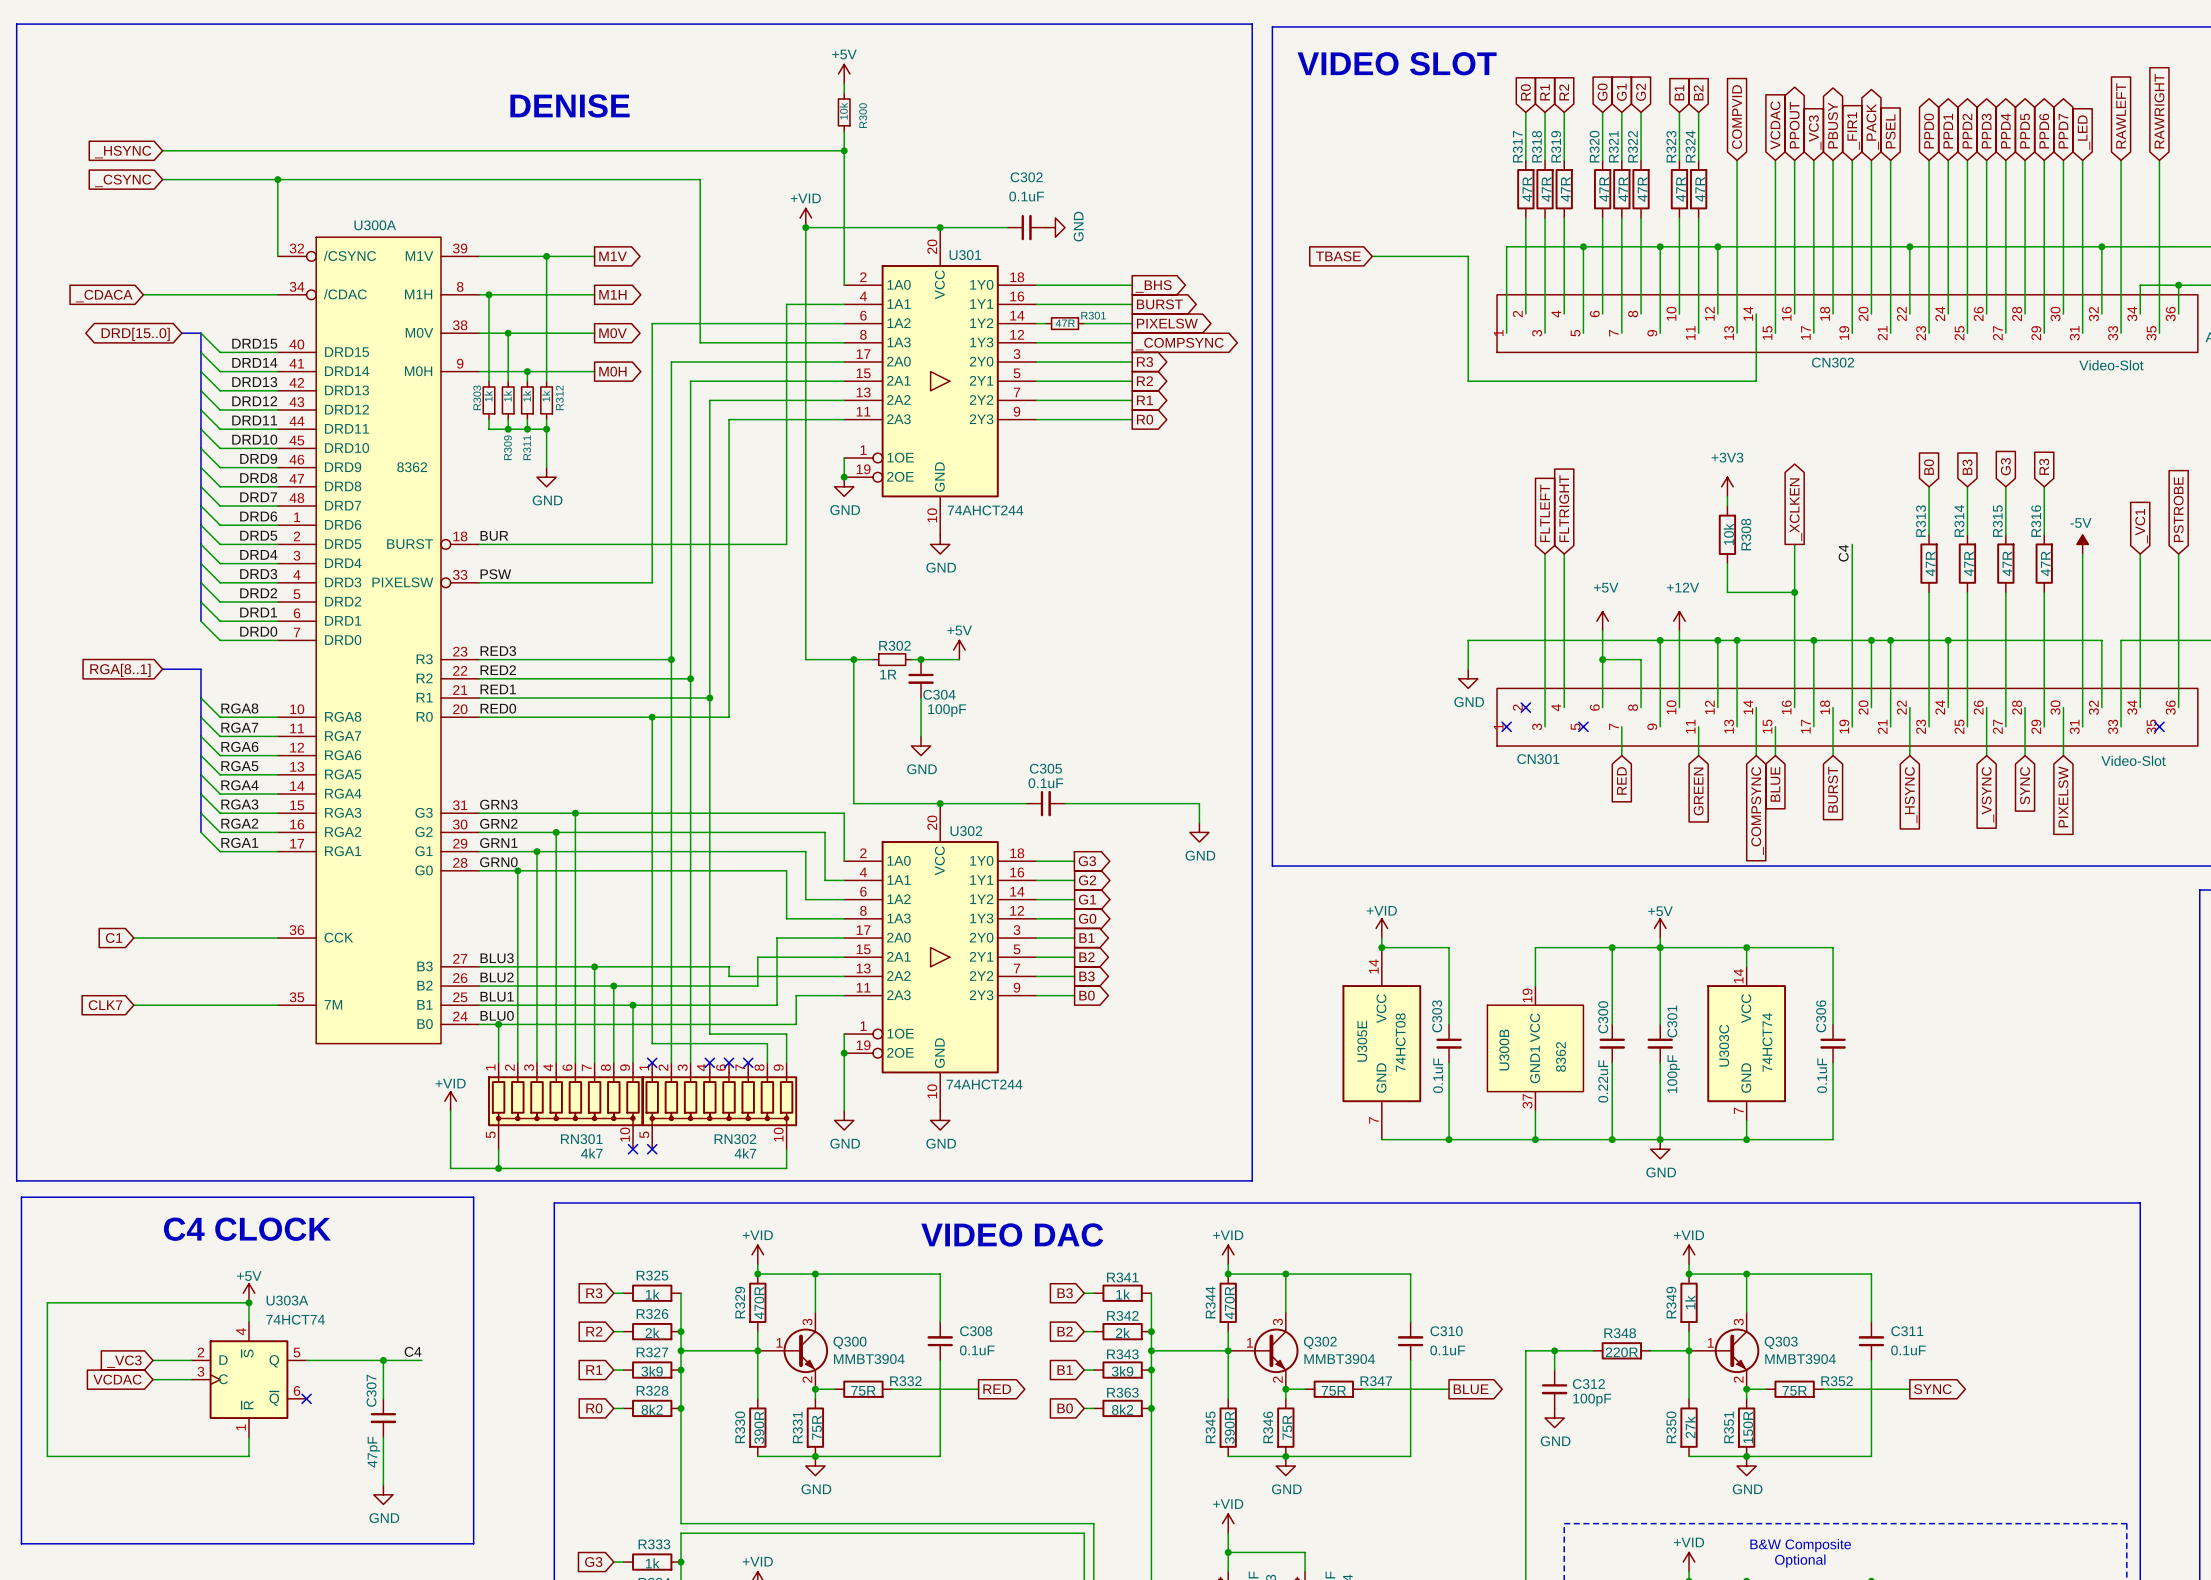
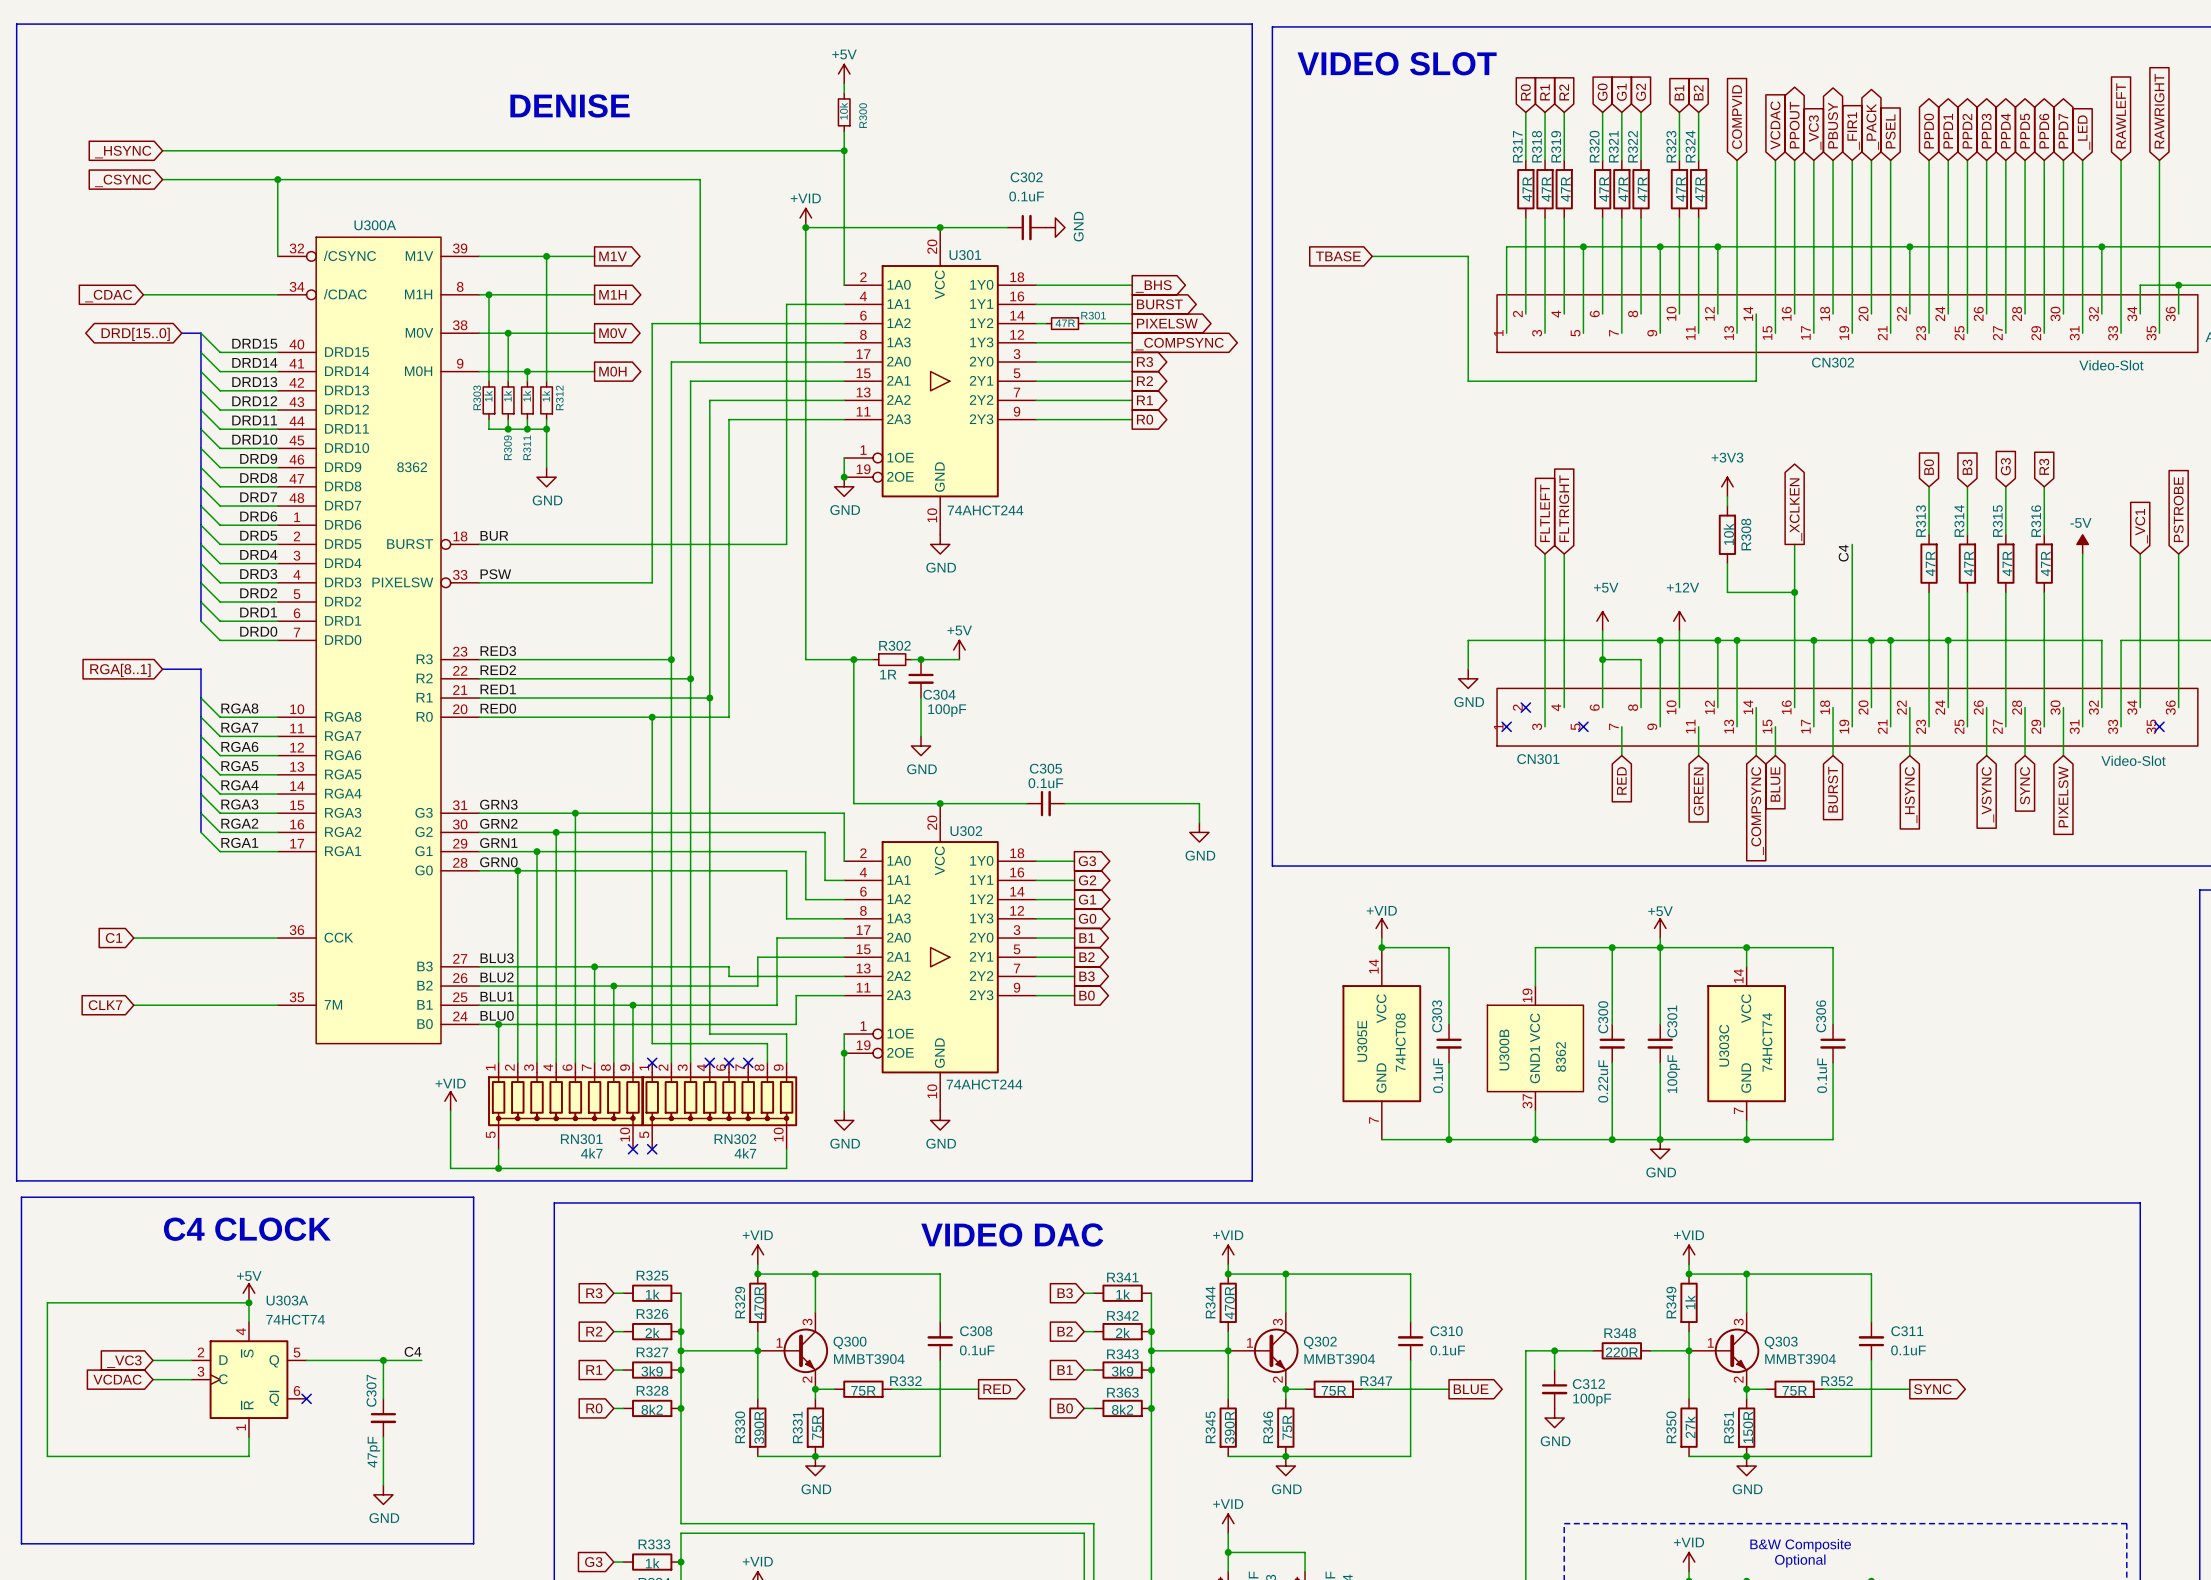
global label: _CDACA (104, 296) -> _CDAC (108, 296)

